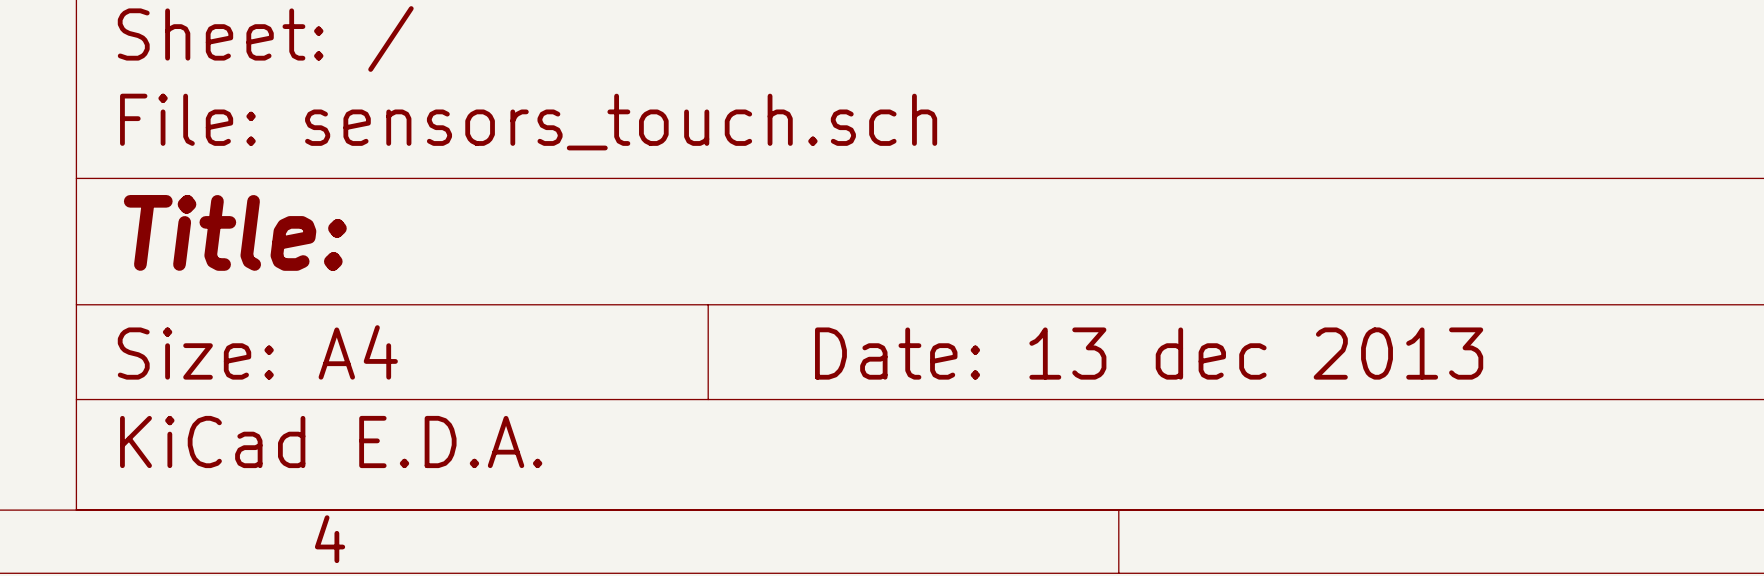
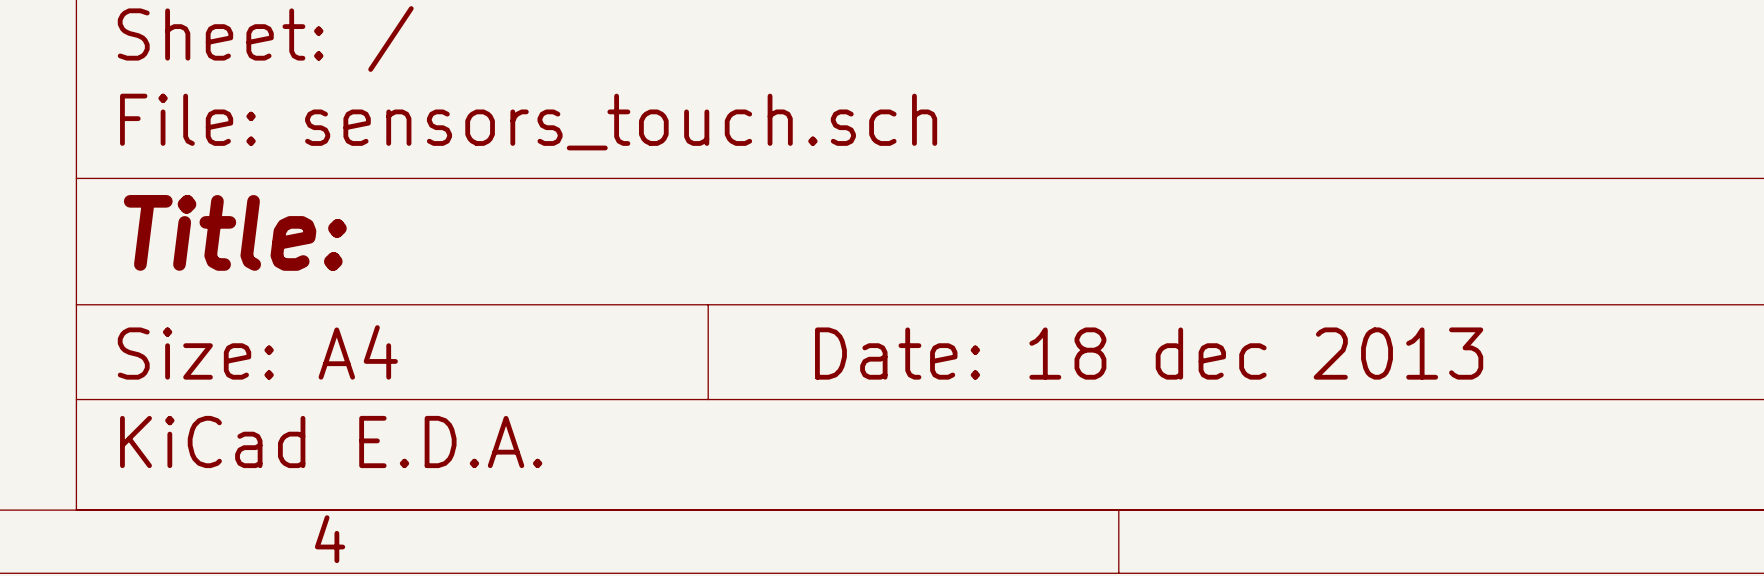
title block: Date: 13 dec 2013 (1149, 353) -> Date: 18 dec 2013 (1149, 353)

